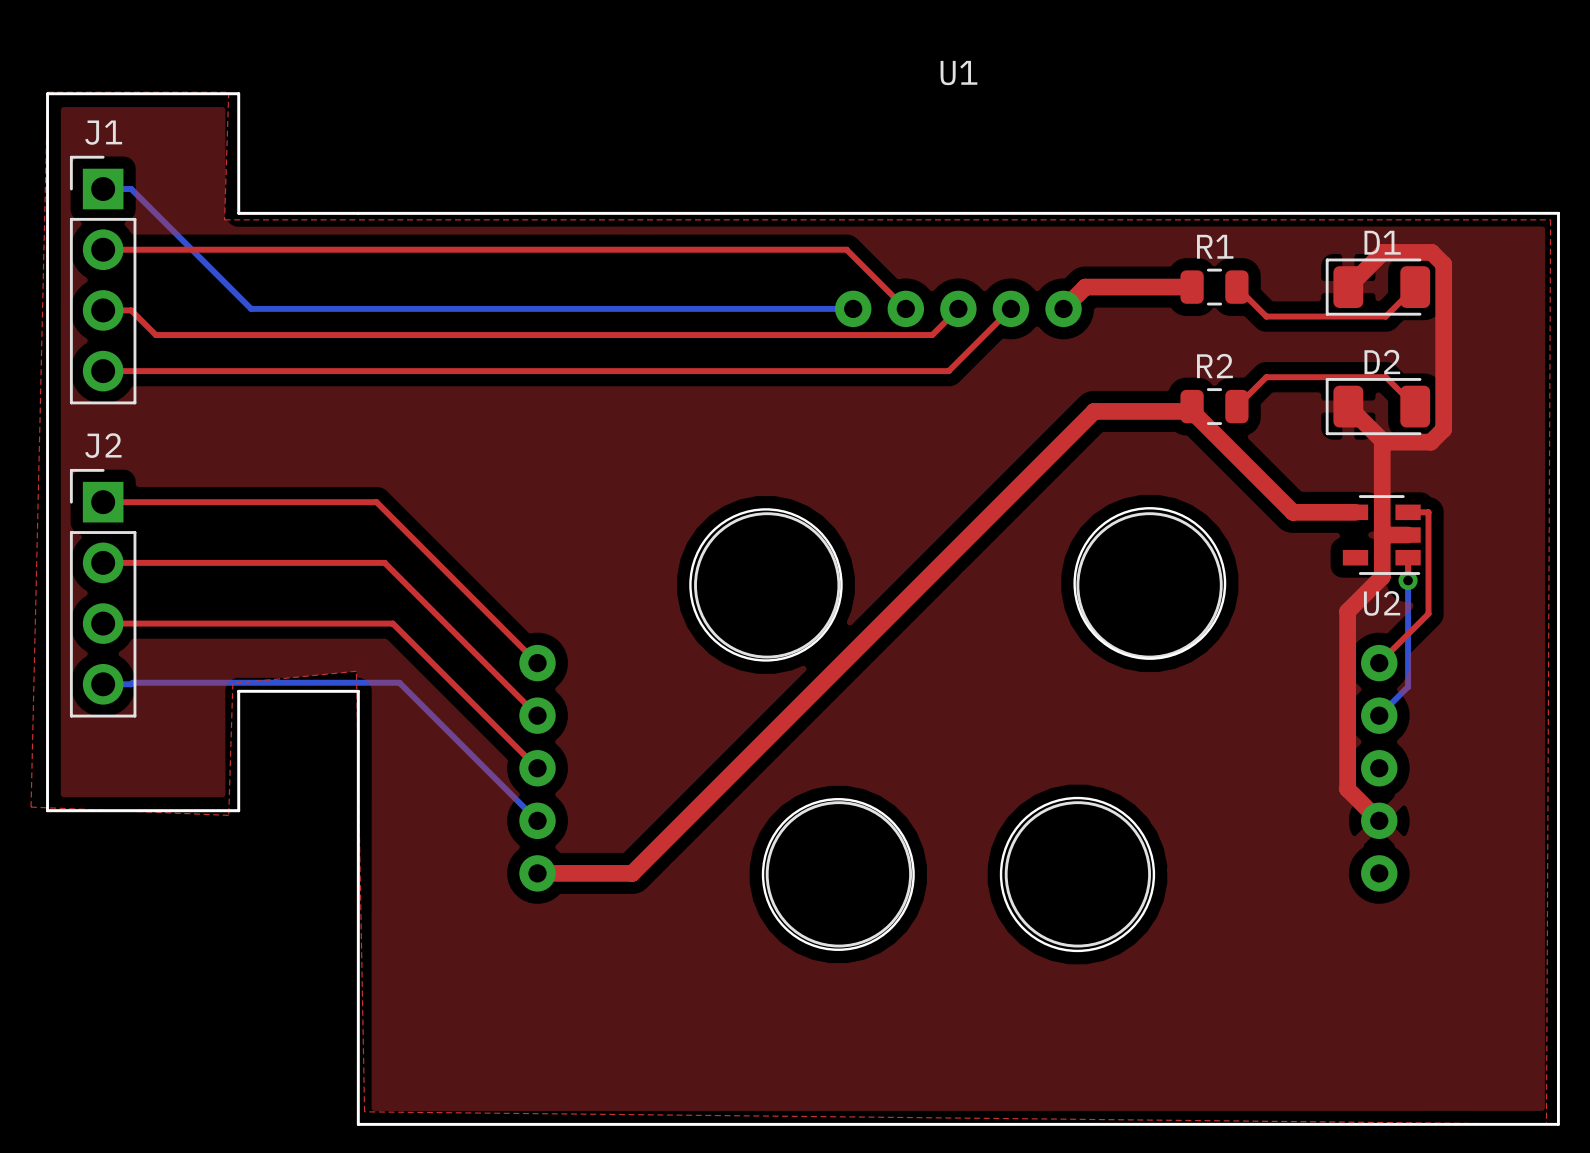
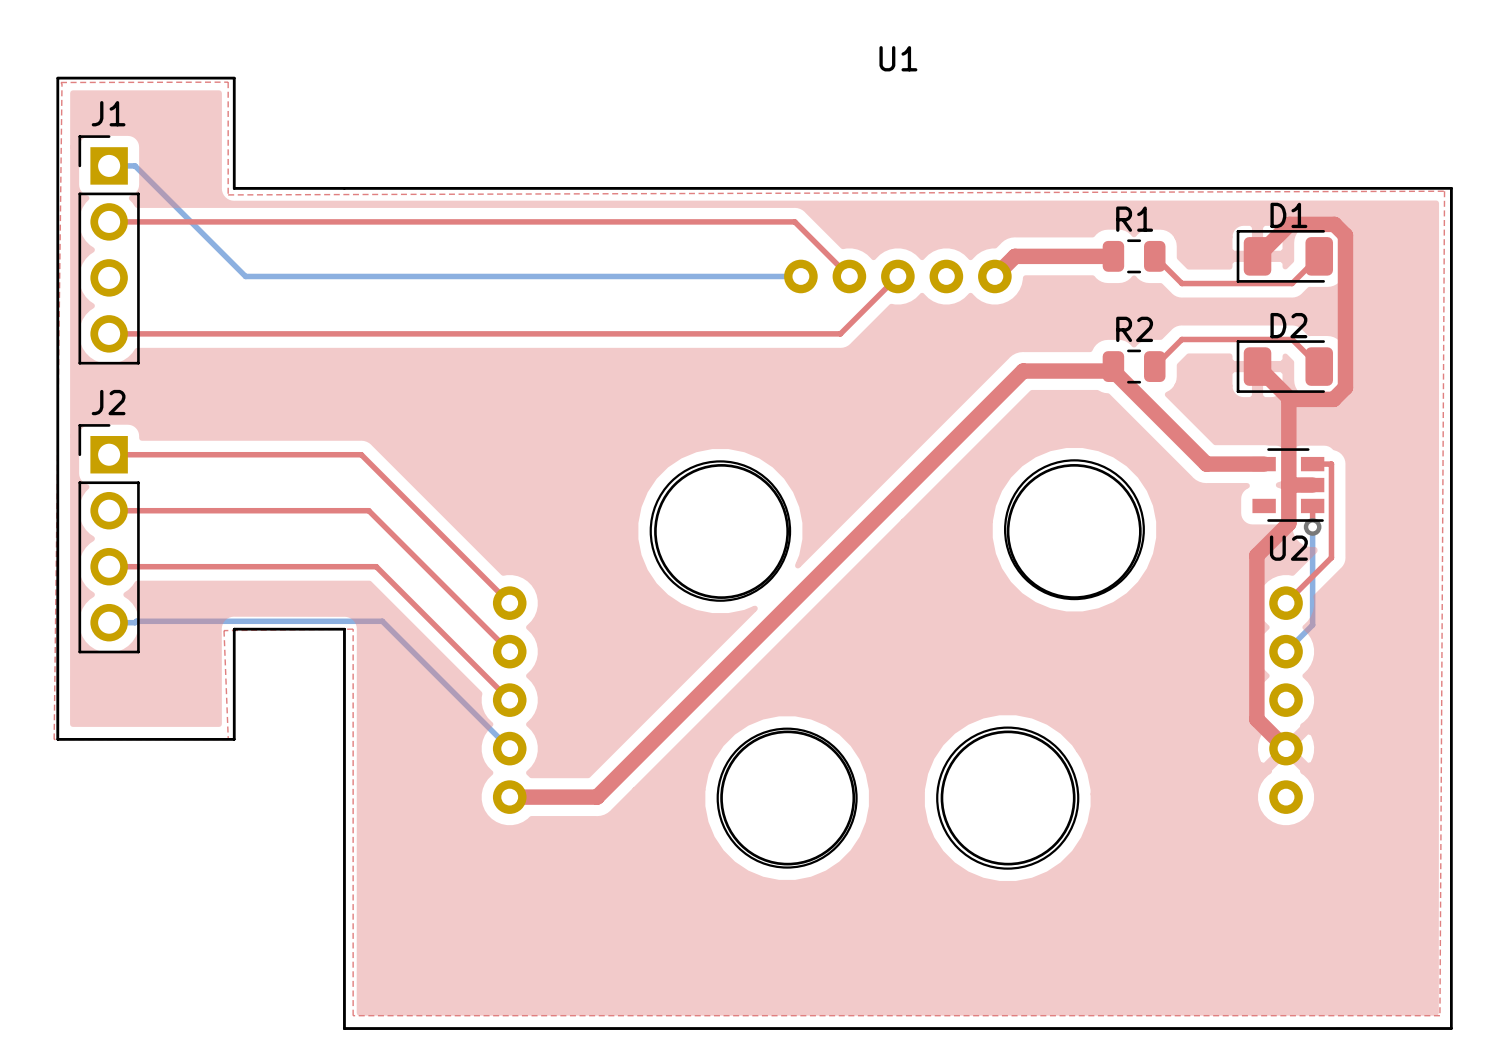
top zone outline: (47, 92) (31, 807) (228, 815) (232, 683) (356, 671) (364, 1111) (1546, 1124) (1550, 219) (224, 219) (228, 92) (47, 92) -> (228, 82) (60, 82) (54, 739) (228, 739) (224, 630) (353, 629) (353, 1015) (1439, 1015) (1444, 191) (228, 194) (228, 82)
top track: (1010, 308) (948, 371) (896, 371) -> (873, 300) (840, 333)
top track: (103, 310) (131, 310) (155, 335) (932, 335) -> none

